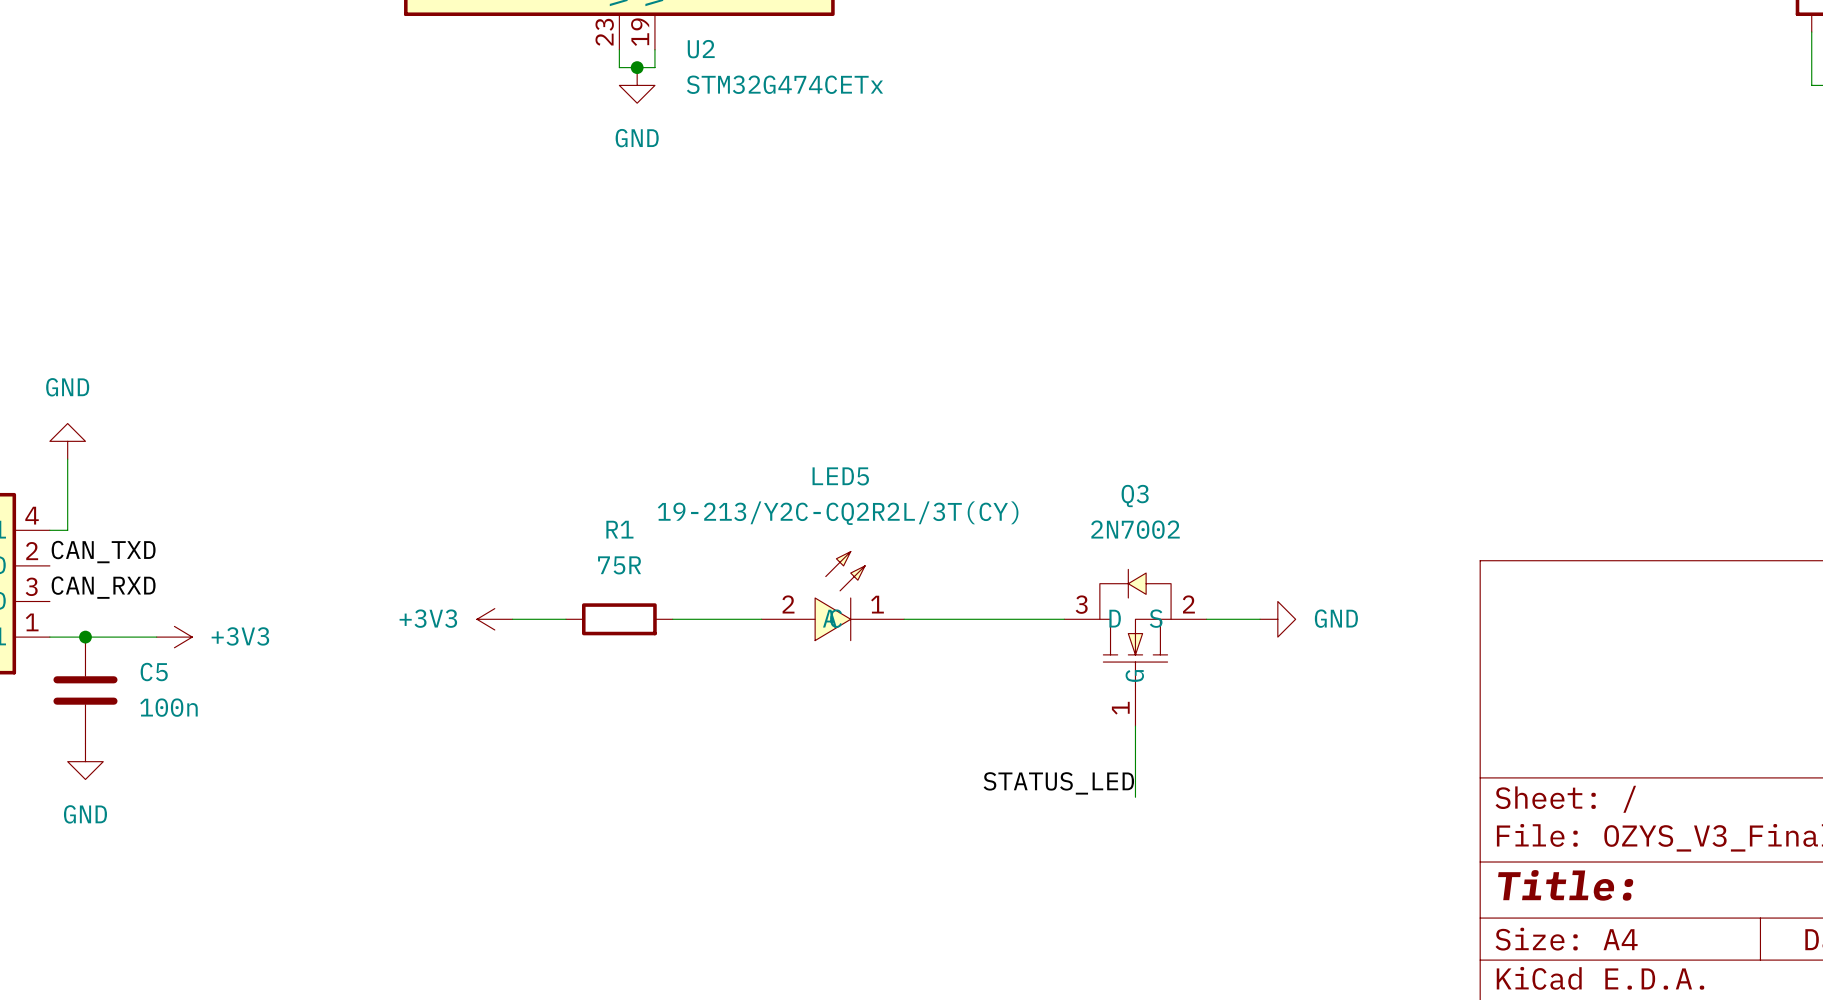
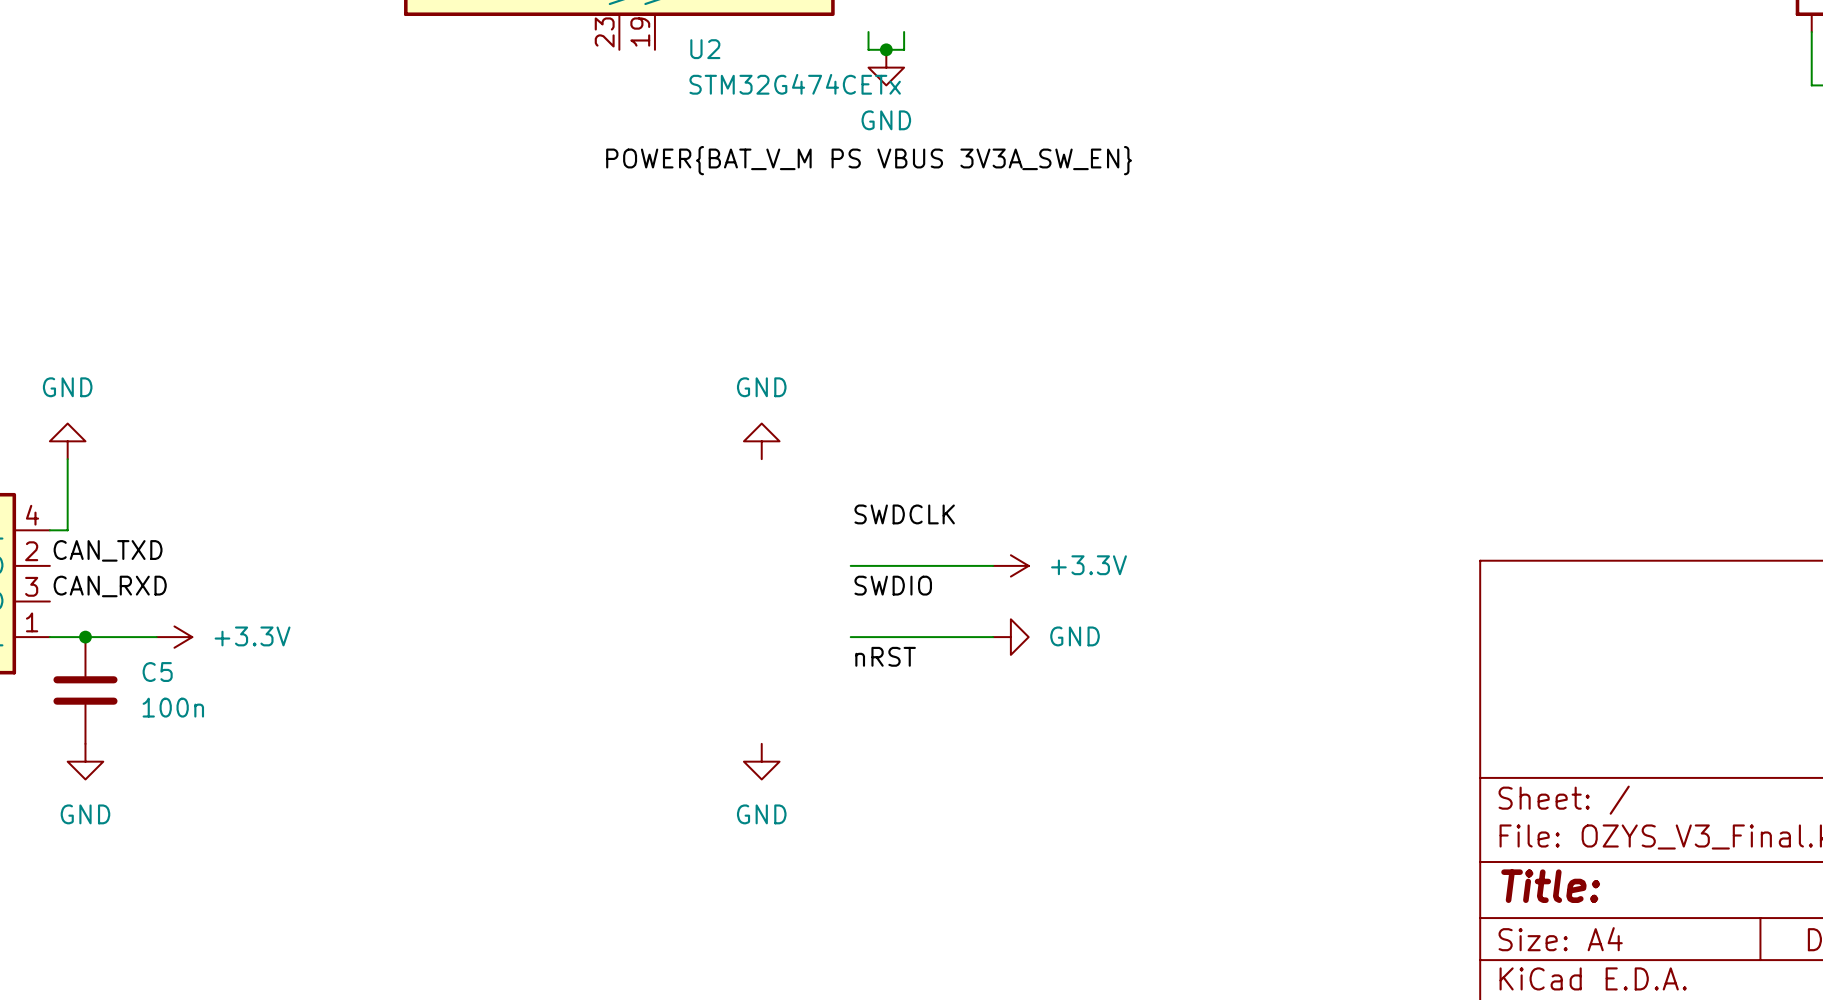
wire: (619, 49) (619, 67) (654, 67) (654, 49) -> (868, 32) (868, 49) (904, 49) (904, 32)
junction: none -> (886, 49)
junction: (637, 67) -> none
power symbol: none -> GND (886, 67)
power symbol: GND (637, 85) -> none
label: none -> POWER{BAT_V_M PS VBUS 3V3A_SW_EN} (869, 160)
power symbol: none -> GND (761, 441)
label: none -> SWDCLK (904, 514)
wire: none -> (850, 565) (993, 565)
power symbol: none -> +3.3V (1010, 565)
label: none -> SWDIO (893, 585)
LED5: 19-213/Y2C-CQ2R2L/3T(CY) (832, 596) -> none
power symbol: +3V3 (494, 619) -> none
wire: (512, 619) (565, 619) -> none
R1: 75R (619, 619) -> none
wire: (672, 619) (761, 619) -> none
wire: (904, 619) (1064, 619) -> none
wire: (1206, 619) (1260, 619) -> none
power symbol position: GND (1277, 619) -> GND (1010, 637)
power symbol: +3V3 (174, 637) -> +3.3V (174, 637)
wire: none -> (850, 637) (993, 637)
Q3: 2N7002 (1135, 647) -> none
label: none -> nRST (885, 656)
wire: (1135, 726) (1135, 797) -> none
power symbol: none -> GND (761, 761)
label: STATUS_LED (1058, 783) -> none

